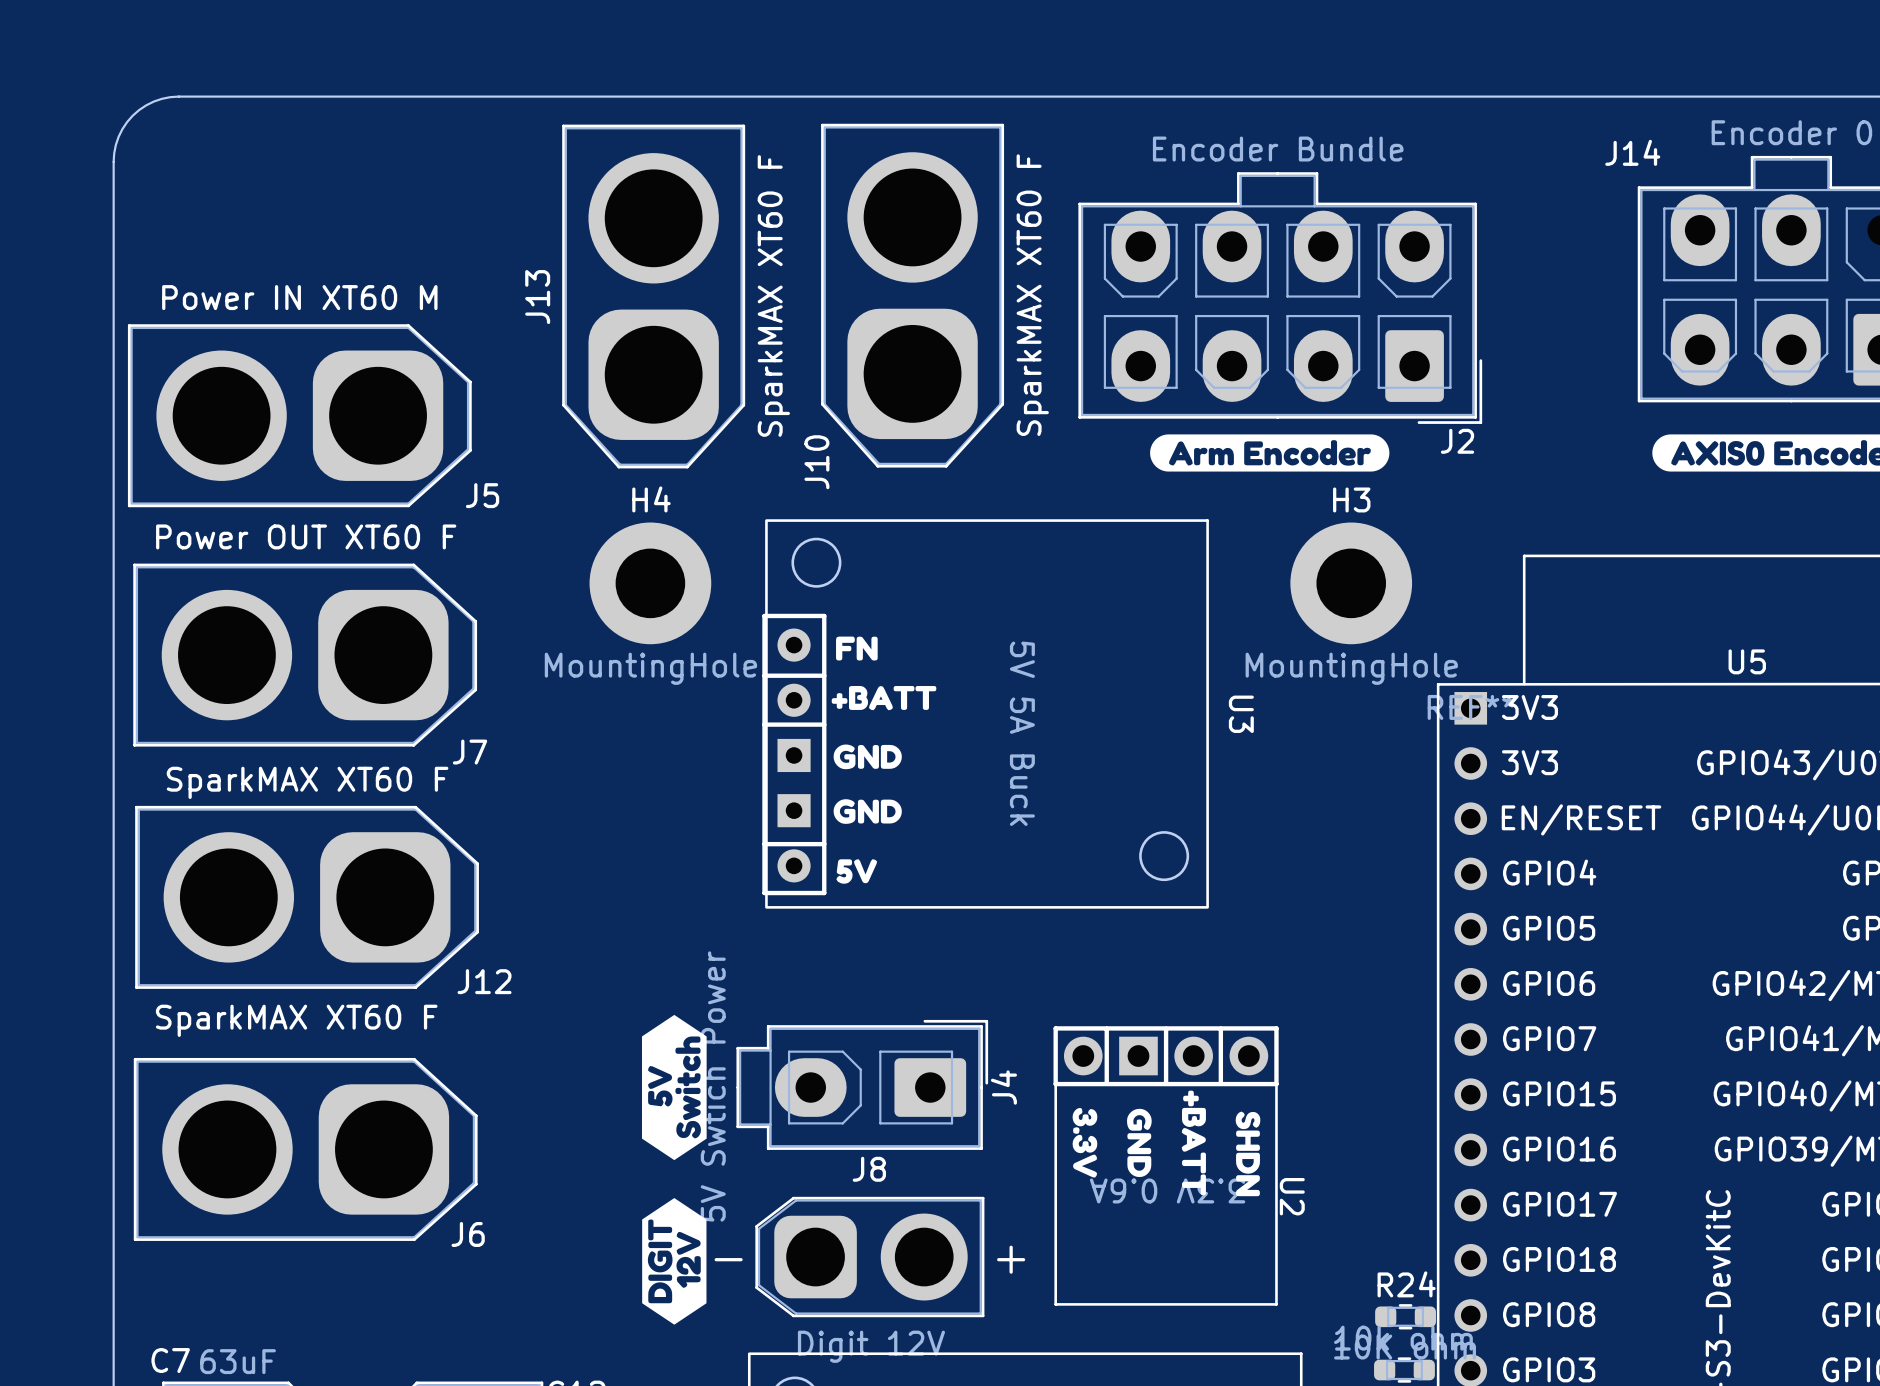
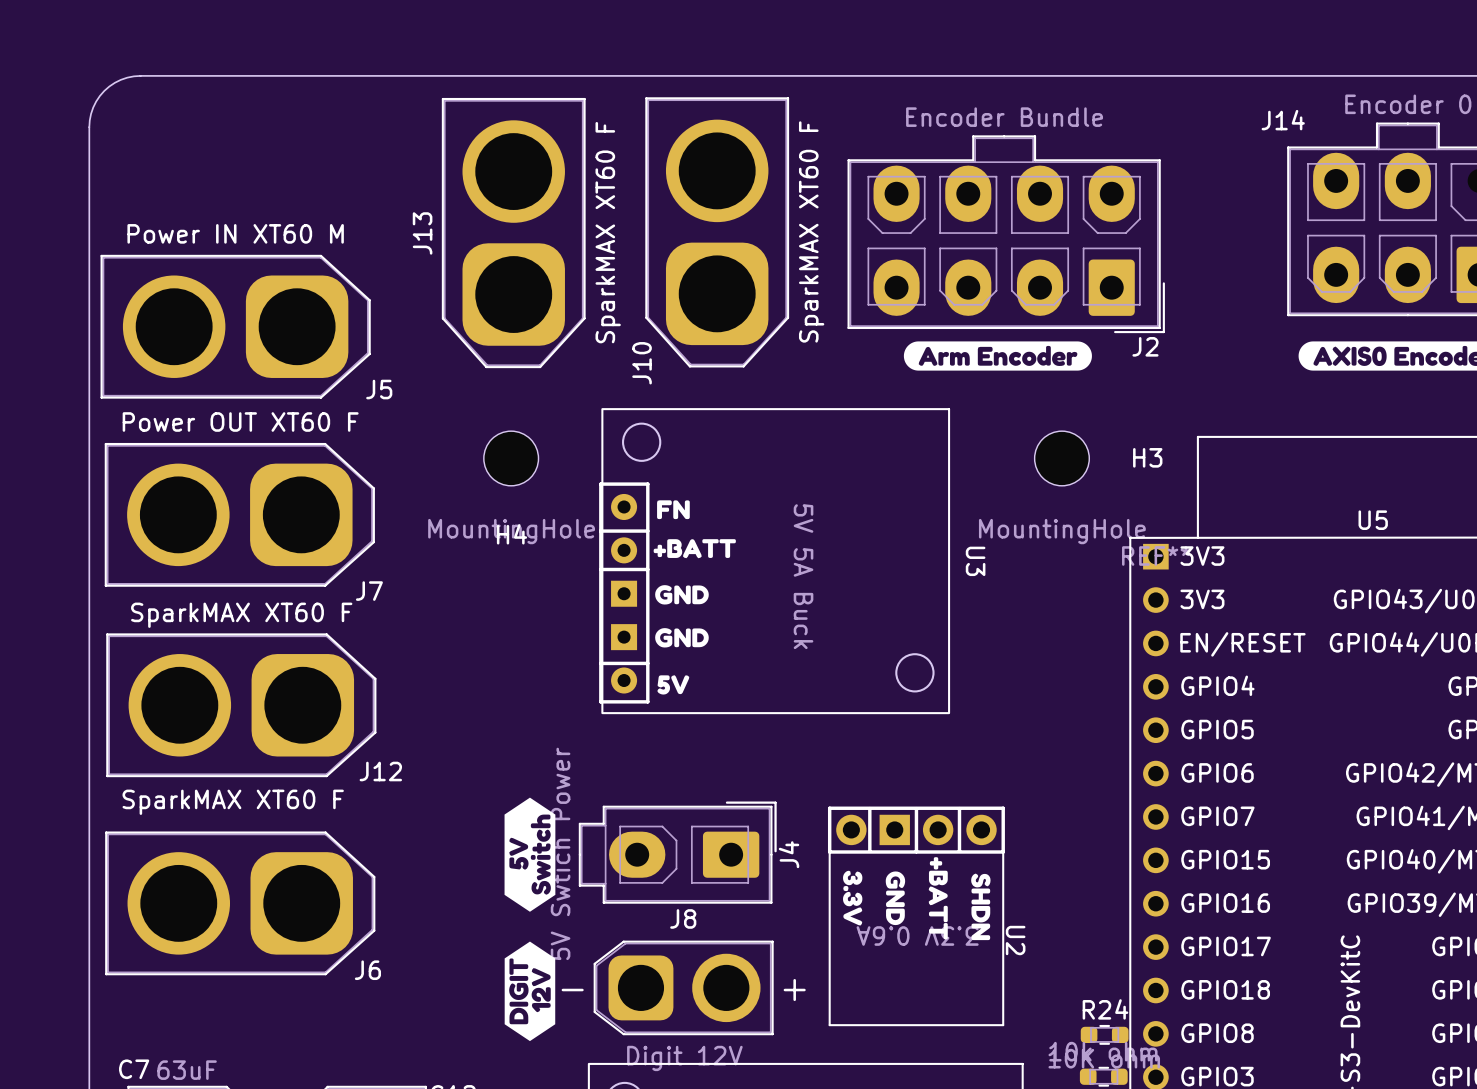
H4 name position: H4 (651, 499) -> H4 (511, 534)
H3 name position: H3 (1351, 499) -> H3 (1147, 457)
H4 footprint: [589, 522, 712, 645] -> [483, 431, 539, 486]
H3 footprint: [1290, 522, 1413, 645] -> [1034, 431, 1090, 486]

